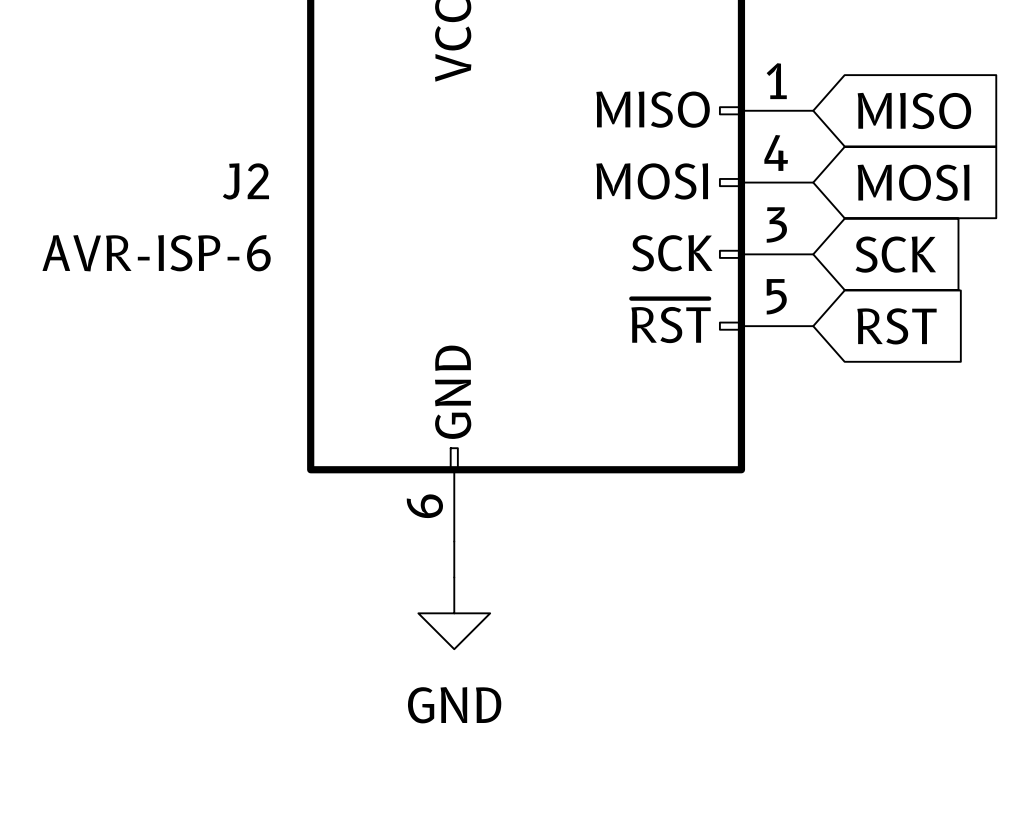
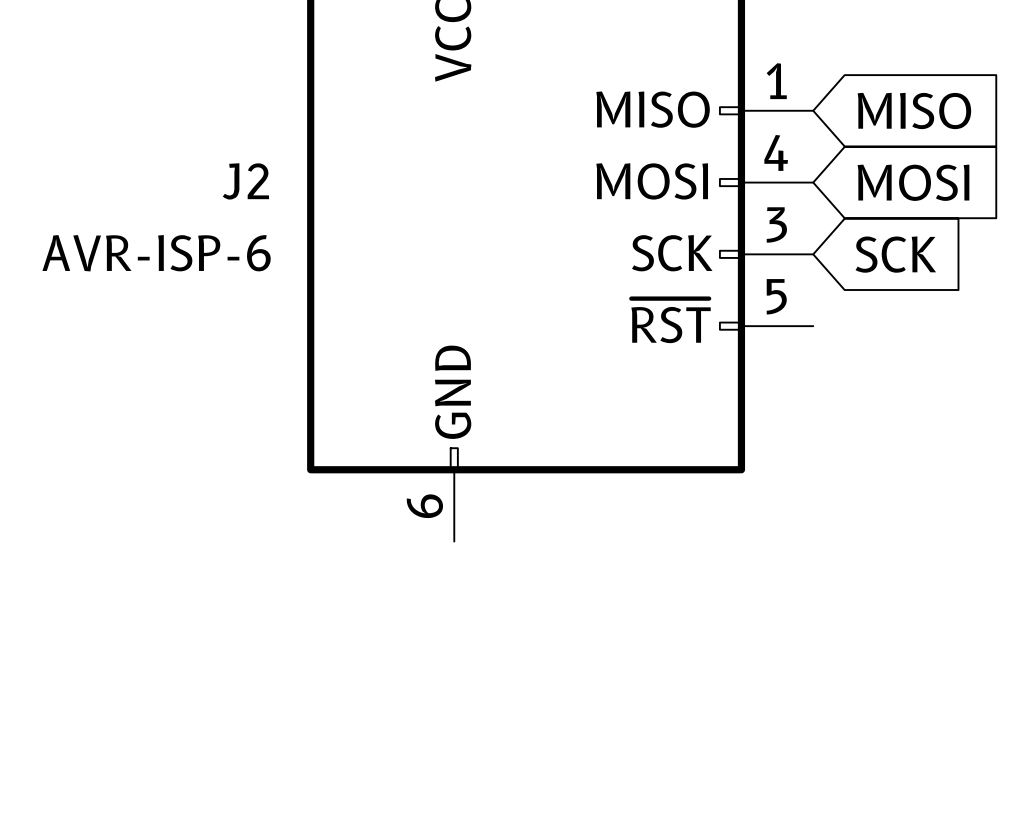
global label: RST (896, 326) -> none
wire: (454, 541) (454, 577) -> none
power symbol: GND (454, 613) -> none

